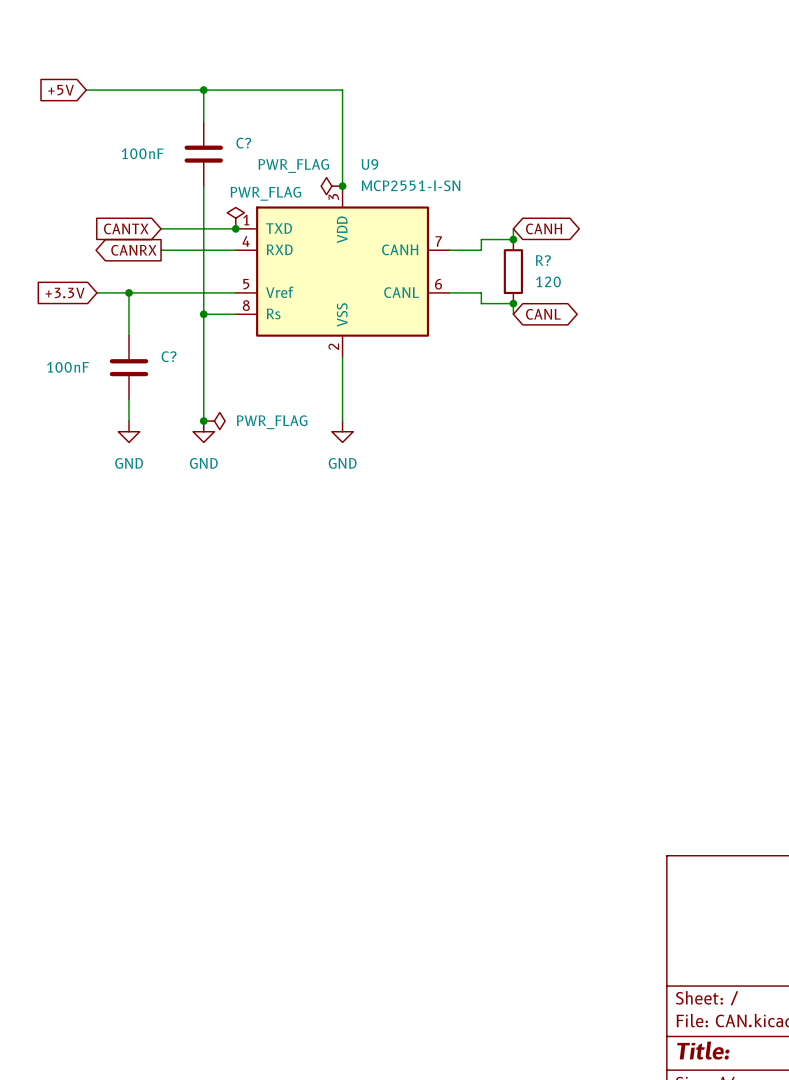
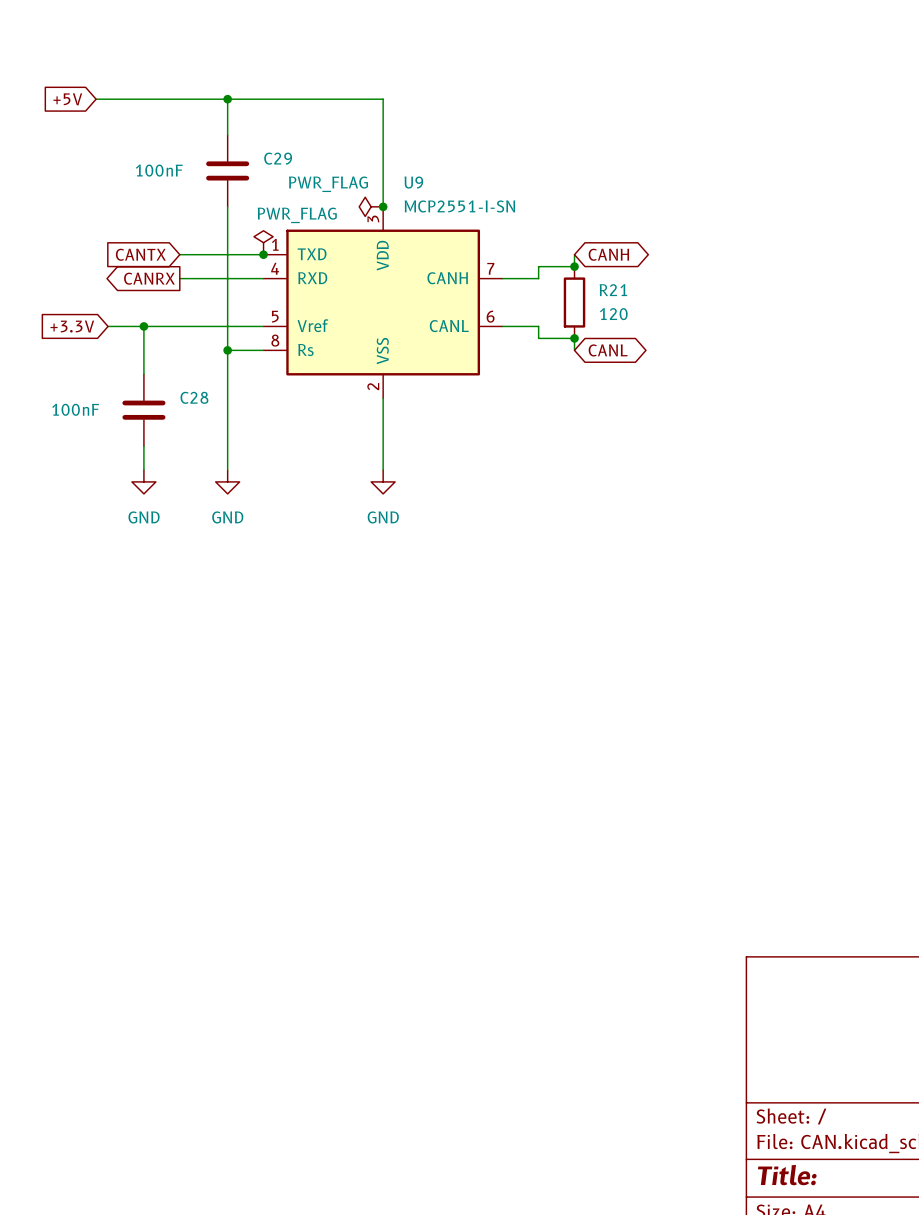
C? name: C? (243, 143) -> C29 (278, 158)
R? name: R? (543, 260) -> R21 (613, 290)
C? name: C? (169, 356) -> C28 (194, 397)
junction: (203, 421) -> none
power symbol: PWR_FLAG (214, 421) -> none

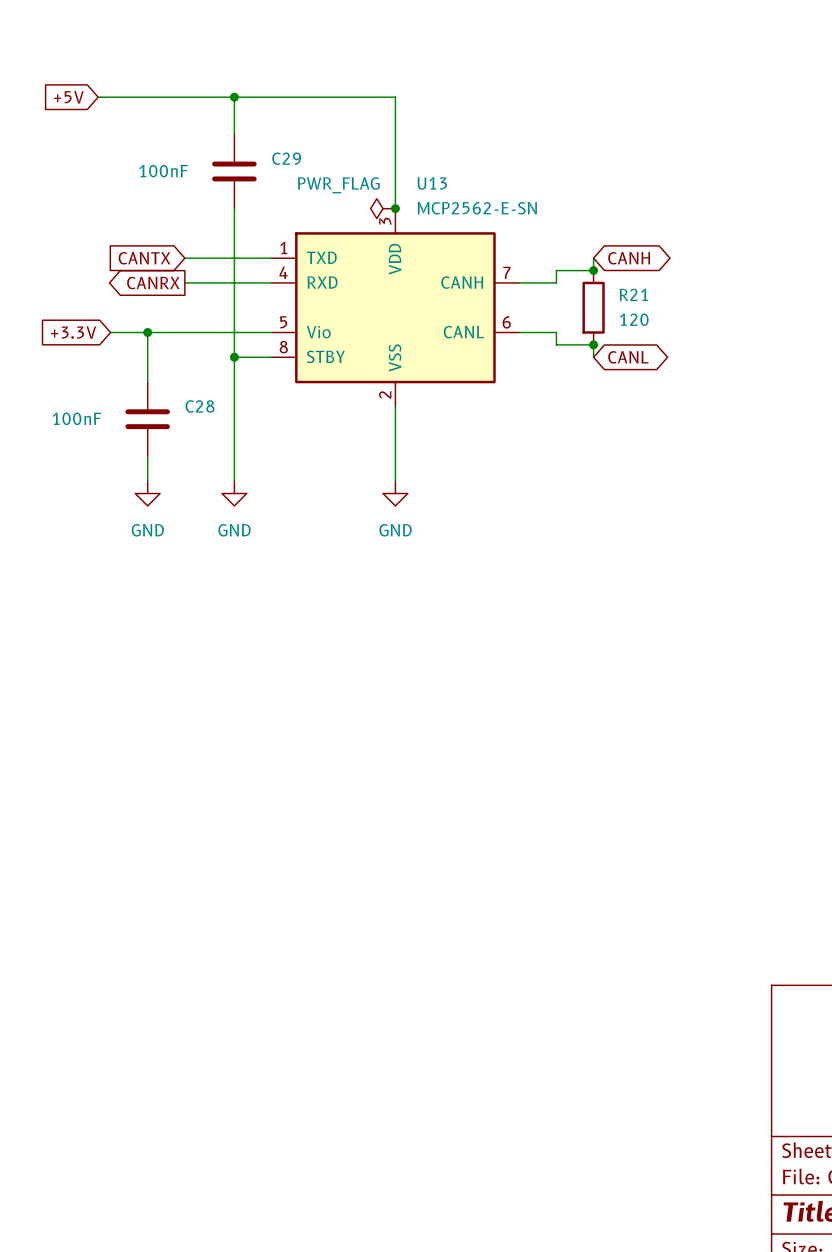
U9 name: U9 (413, 182) -> U13 (432, 183)
U9 value: MCP2551-I-SN (459, 206) -> MCP2562-E-SN (477, 208)
power symbol: PWR_FLAG (263, 242) -> none
junction: (263, 254) -> none
U9 pin name: Vref (312, 325) -> Vio (318, 332)
U9 pin name: Rs (305, 350) -> STBY (325, 356)

